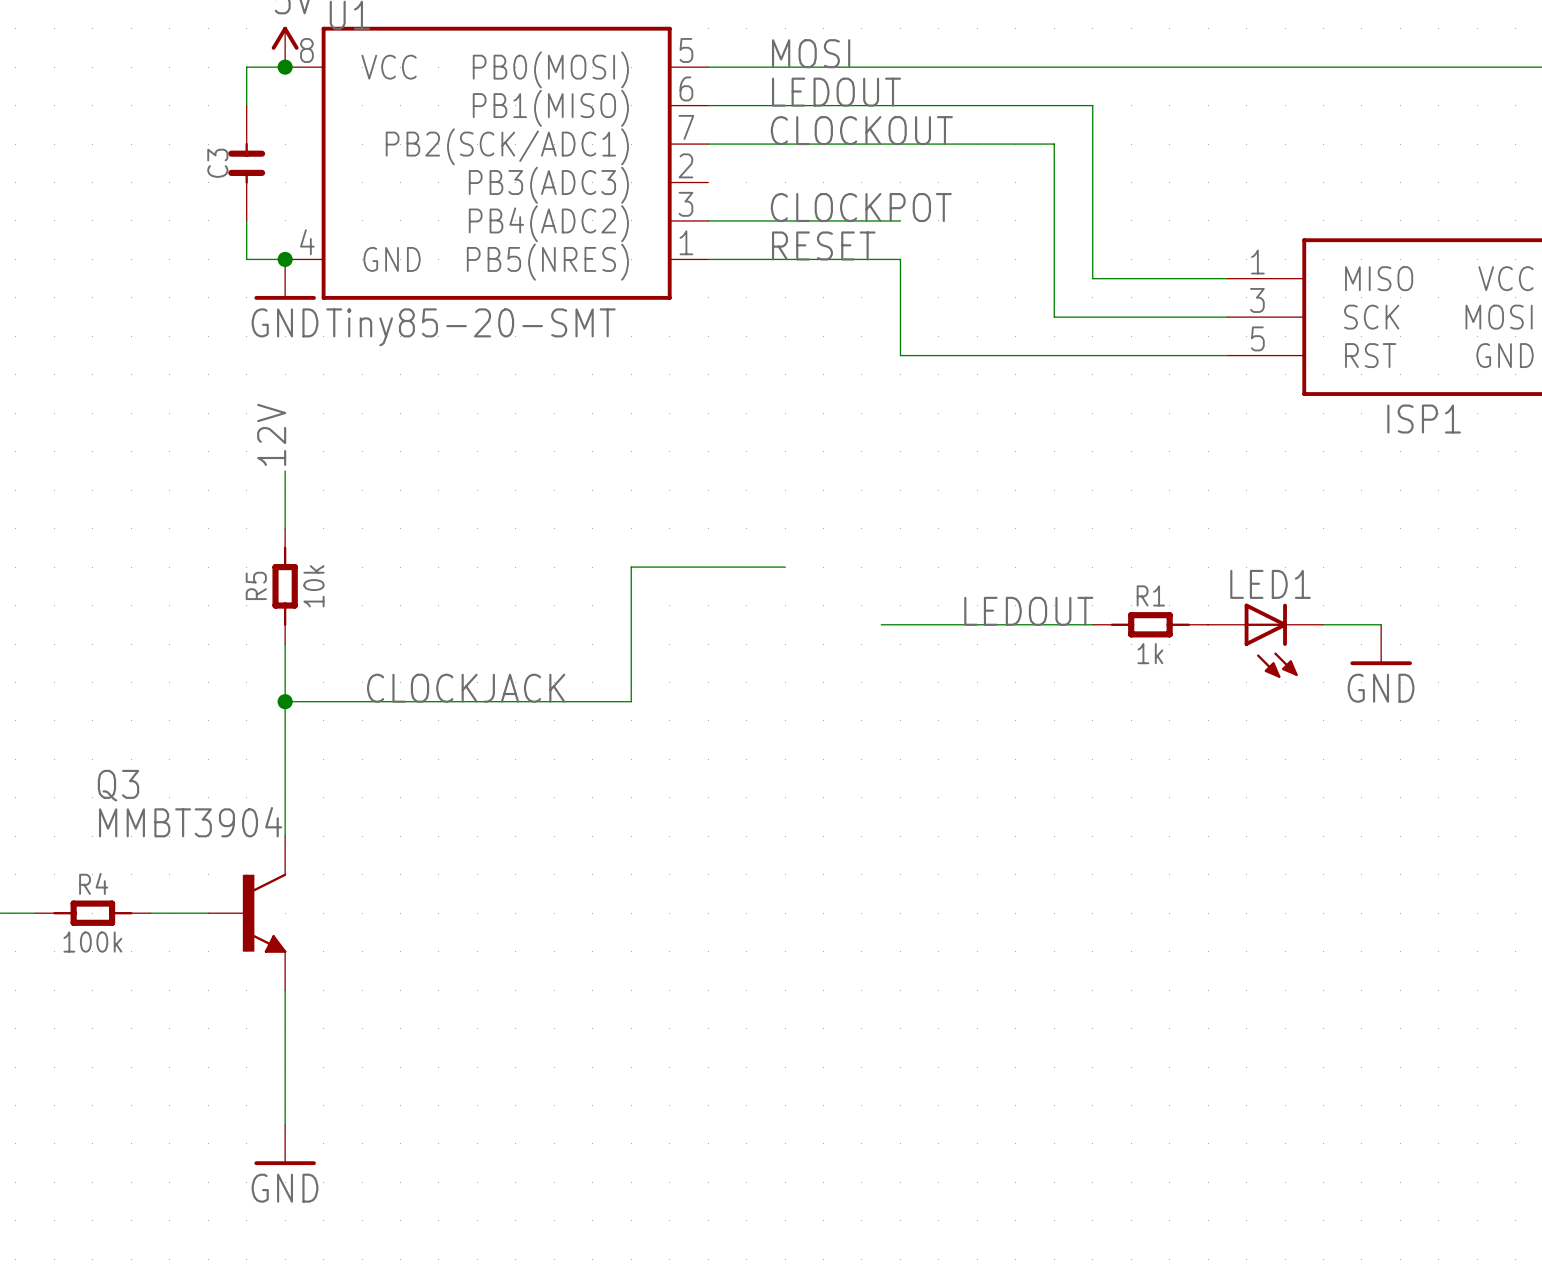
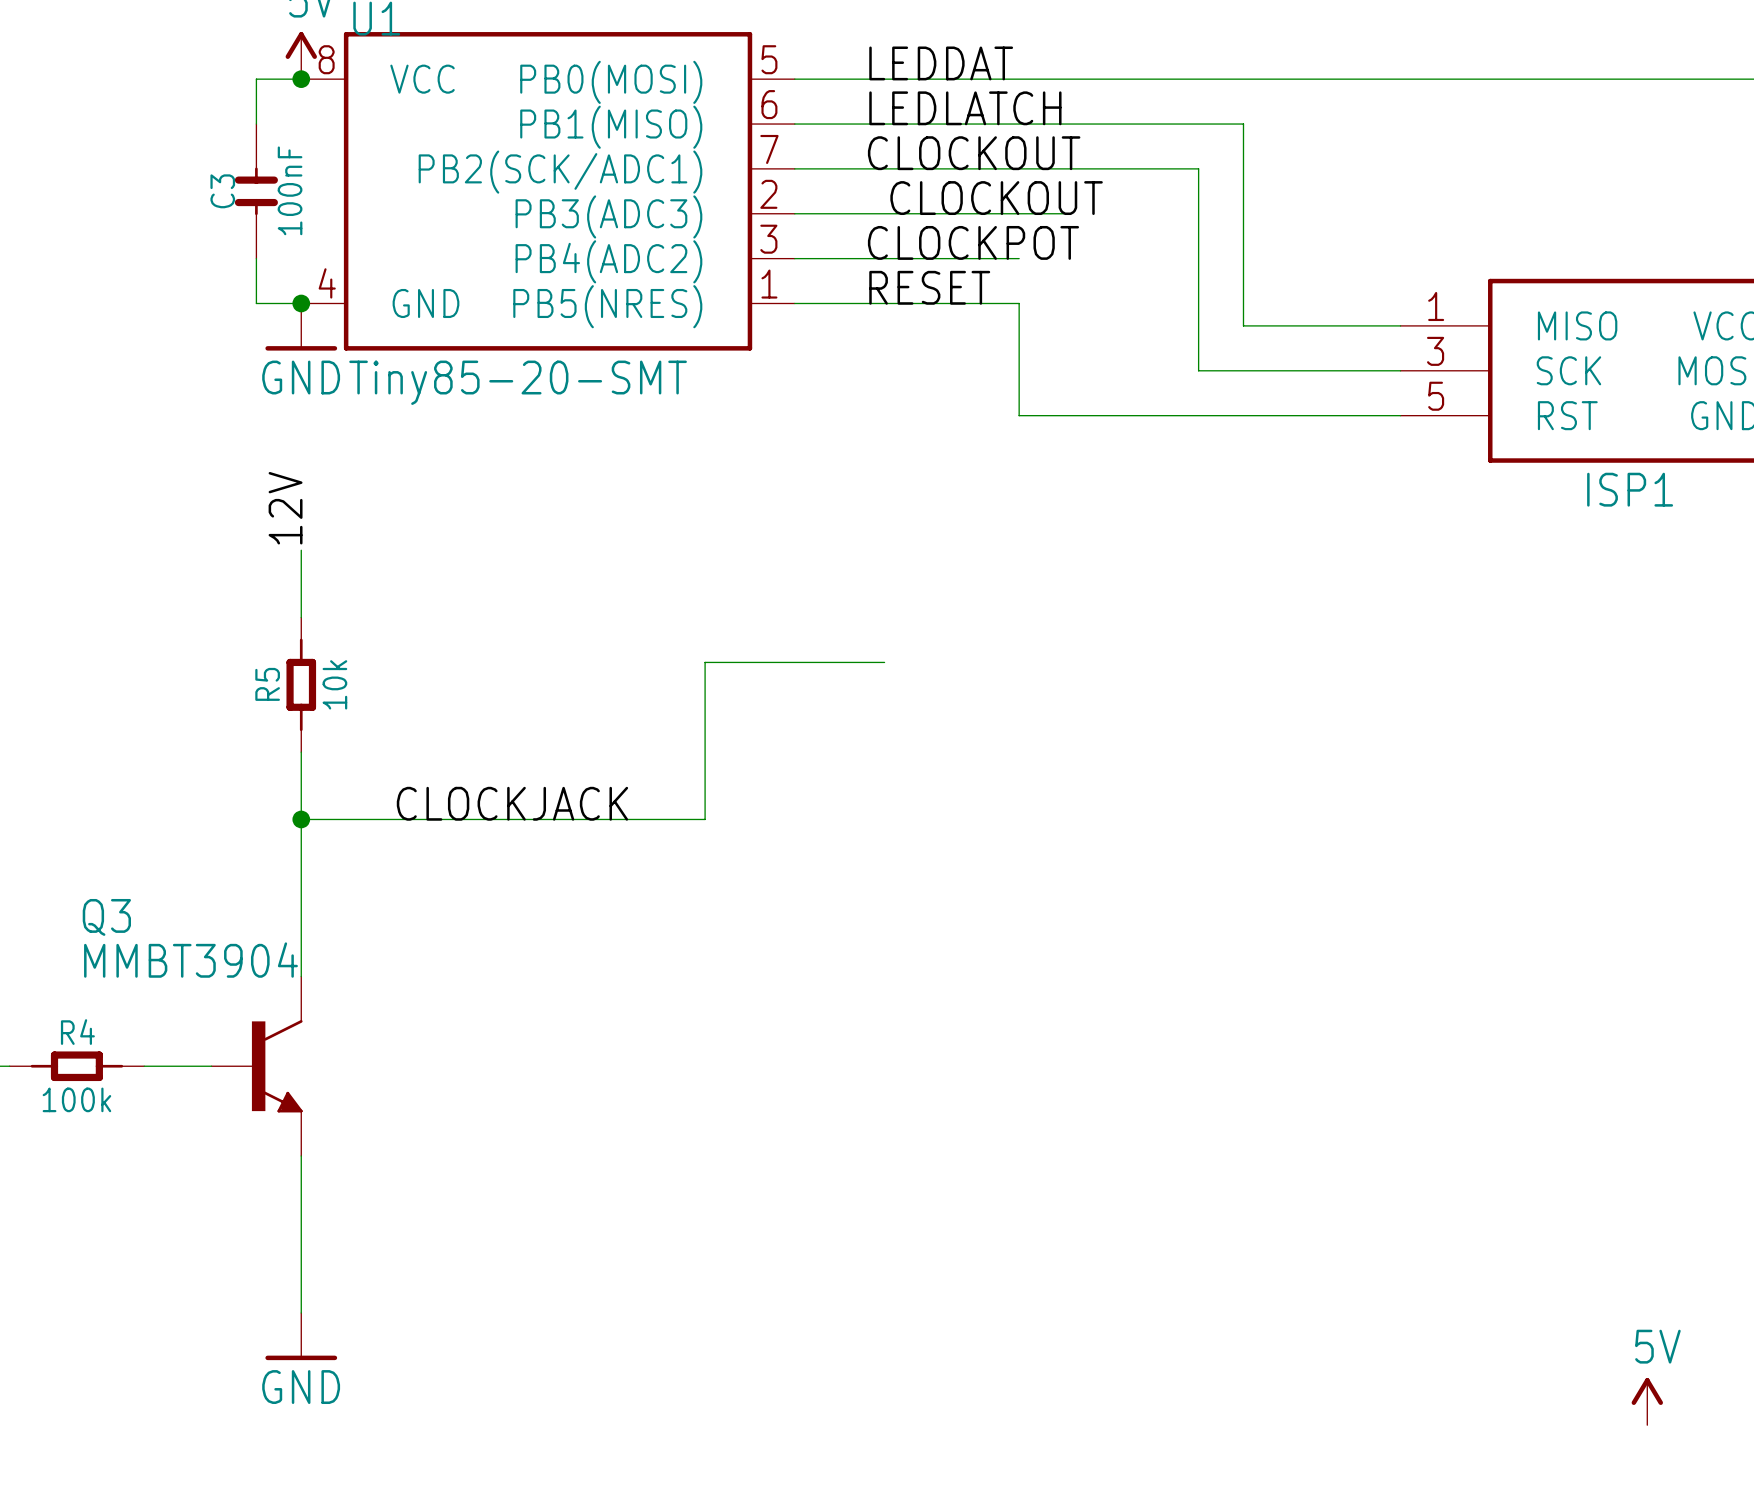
label: MOSI (811, 53) -> LEDDAT (941, 63)
label: LEDOUT (836, 92) -> LEDLATCH (965, 108)
C3 value: none -> 100nF (290, 190)
label: none -> CLOCKOUT (996, 198)
wire: none -> (794, 213) (1064, 213)
label: LEDOUT (1028, 611) -> none
wire: (881, 624) (1092, 624) -> none
R1: 1k (1150, 624) -> none
wire: (1323, 624) (1381, 624) -> none
LED1: (1265, 640) -> none
power symbol: GND (1381, 644) -> none
power symbol: none -> 5V (1647, 1401)

